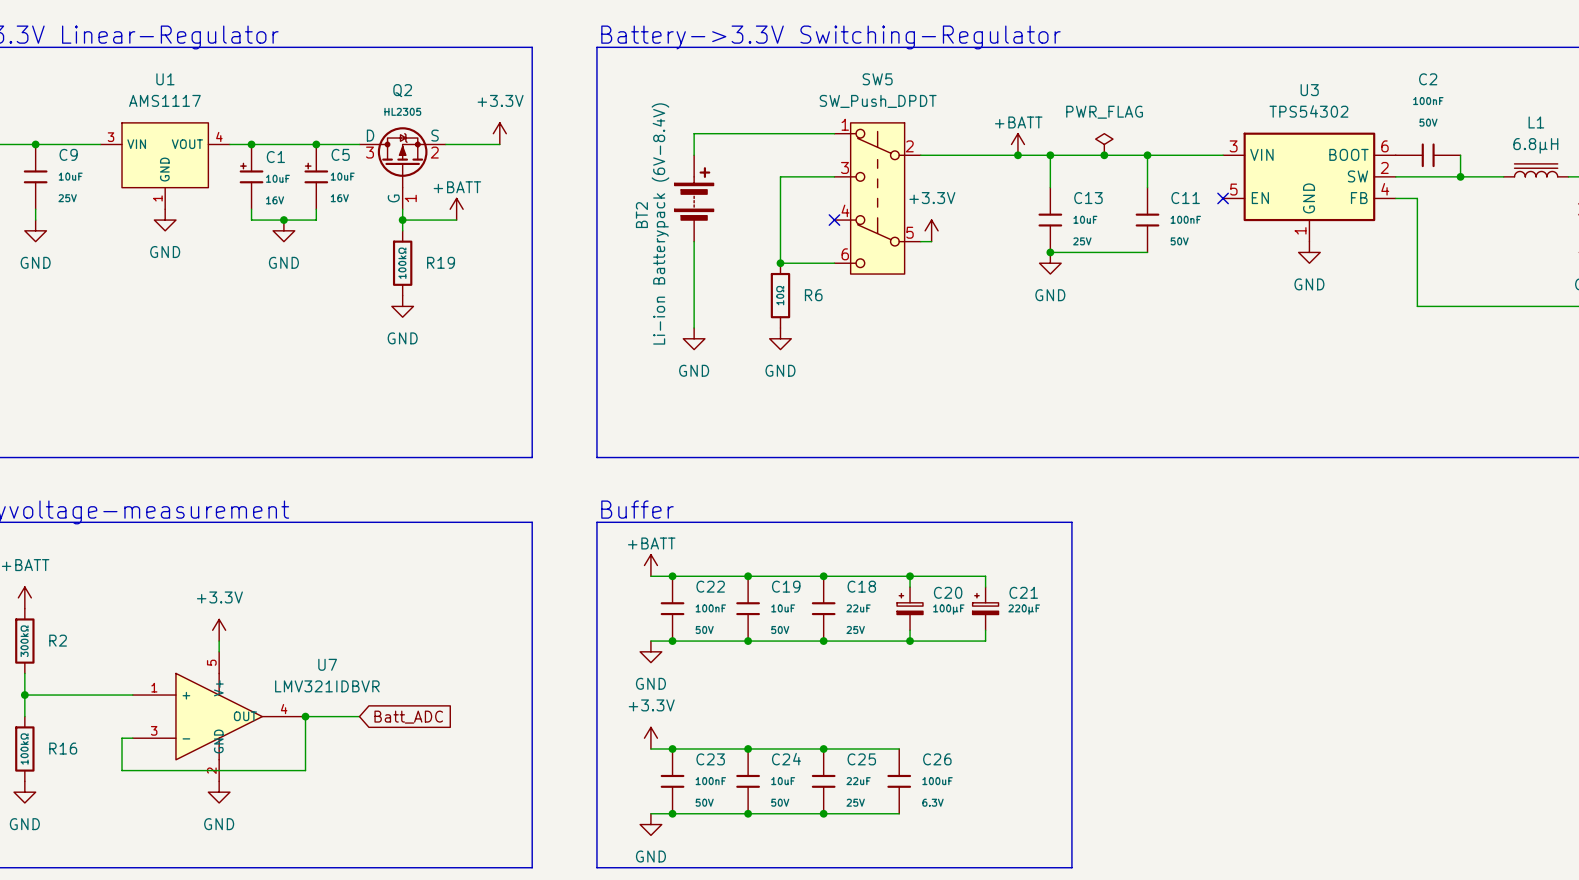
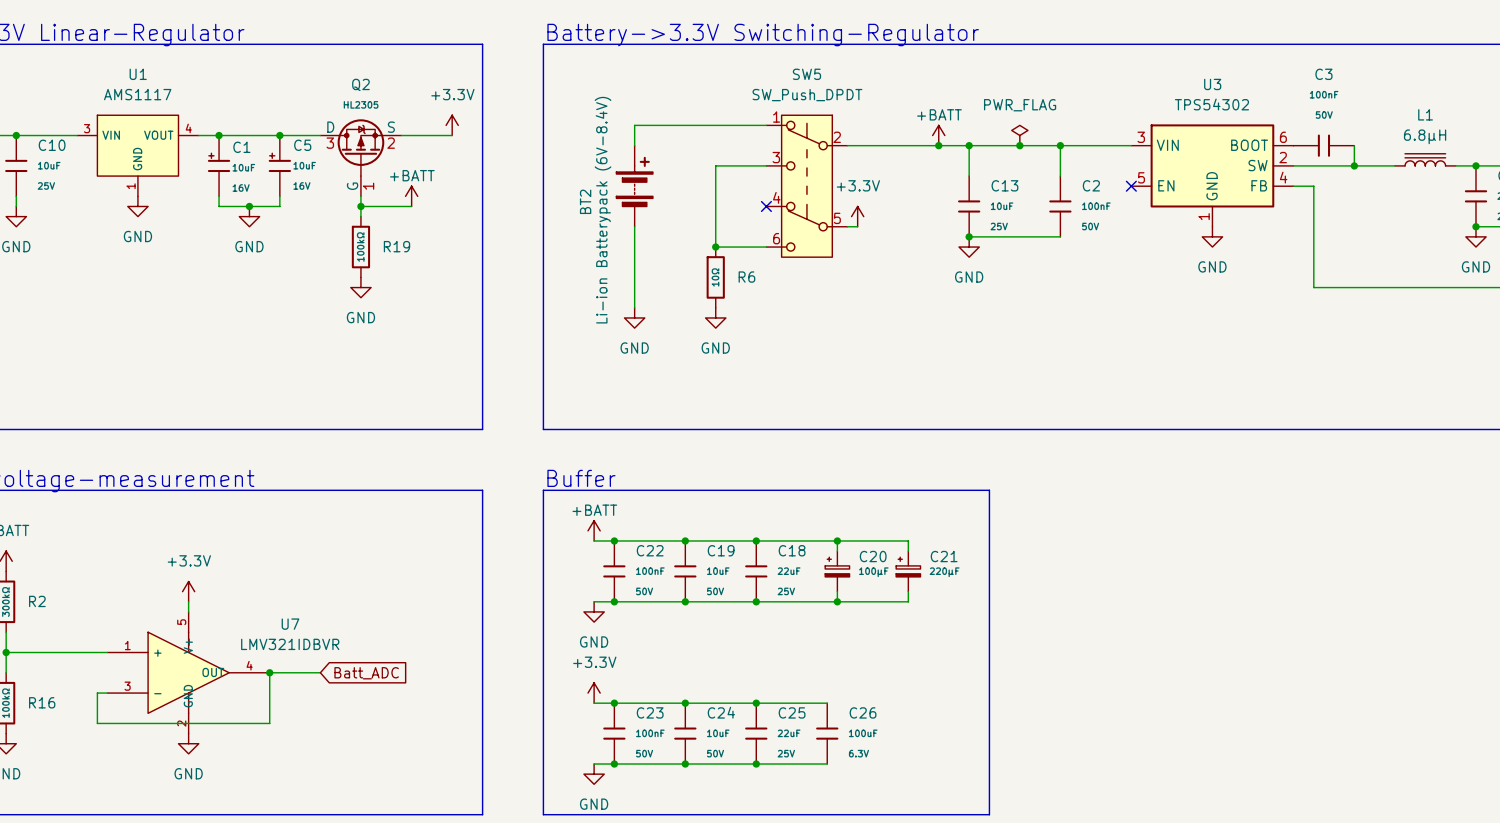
C2 name: C2 (1428, 79) -> C3 (1323, 74)
C9 name: C9 (68, 154) -> C10 (52, 145)
C11 name: C11 (1185, 198) -> C2 (1091, 185)

